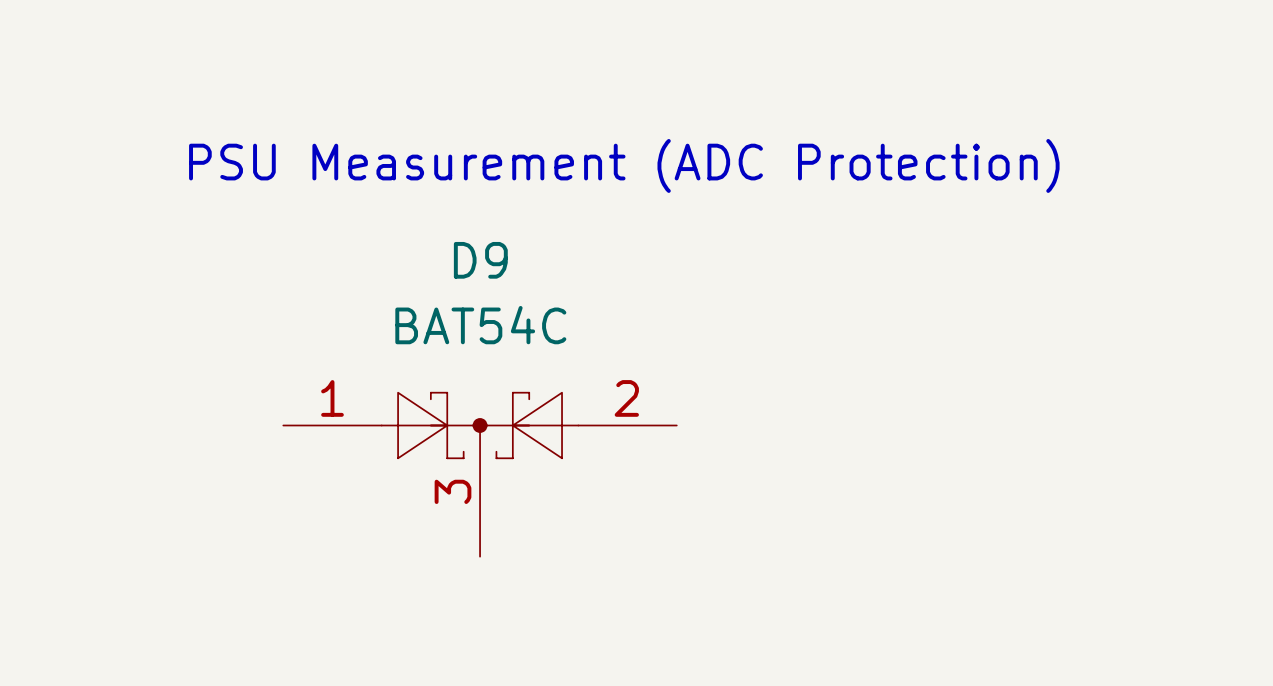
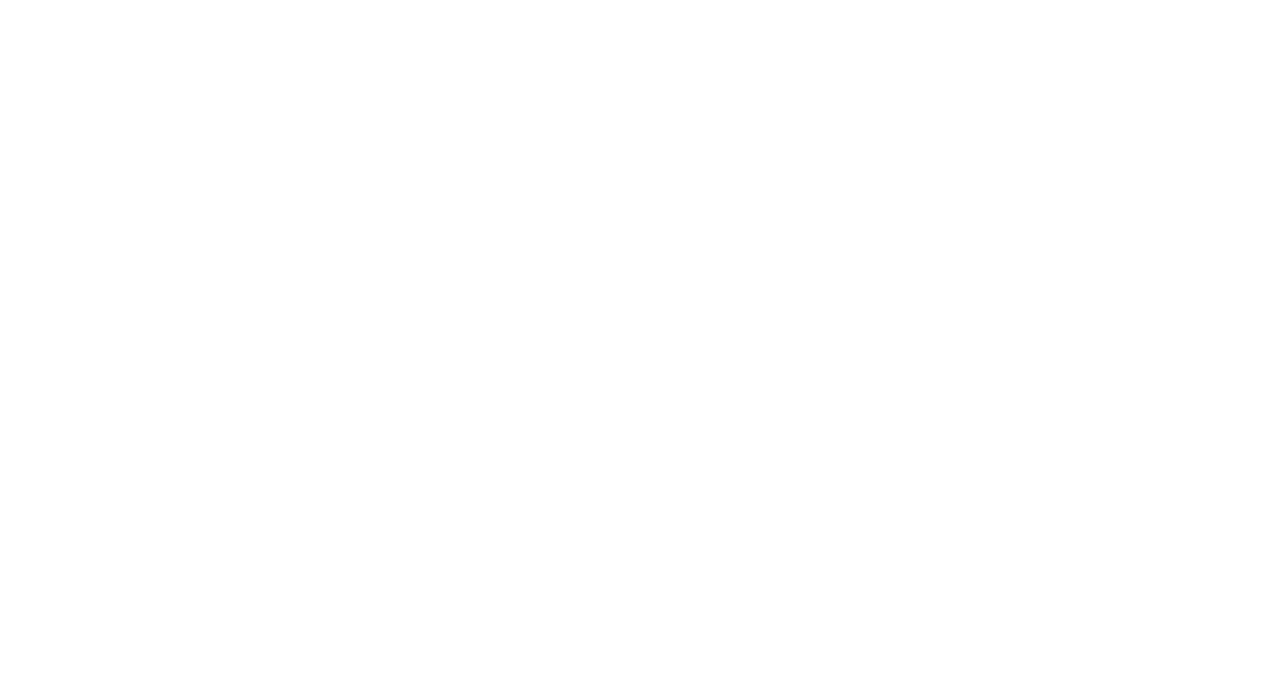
text: PSU Measurement (ADC Protection) (624, 165) -> none
D9: BAT54C (480, 474) -> none

